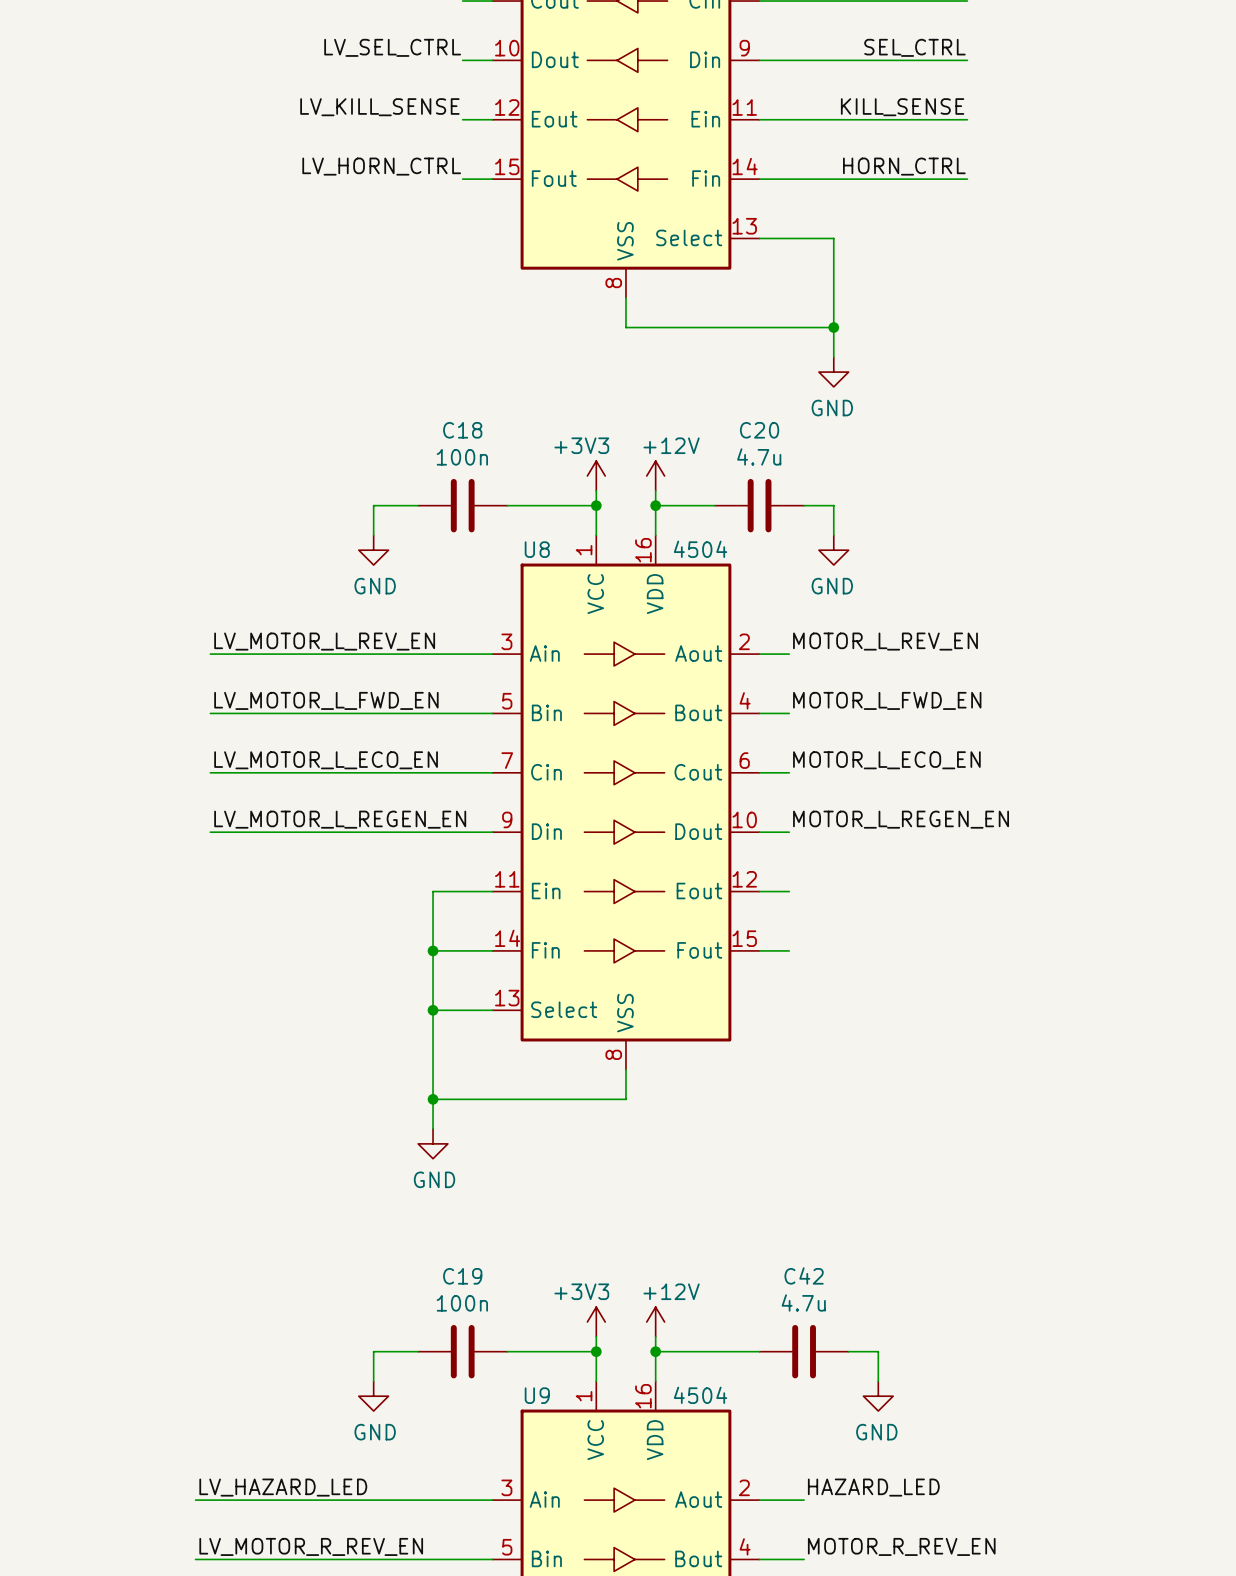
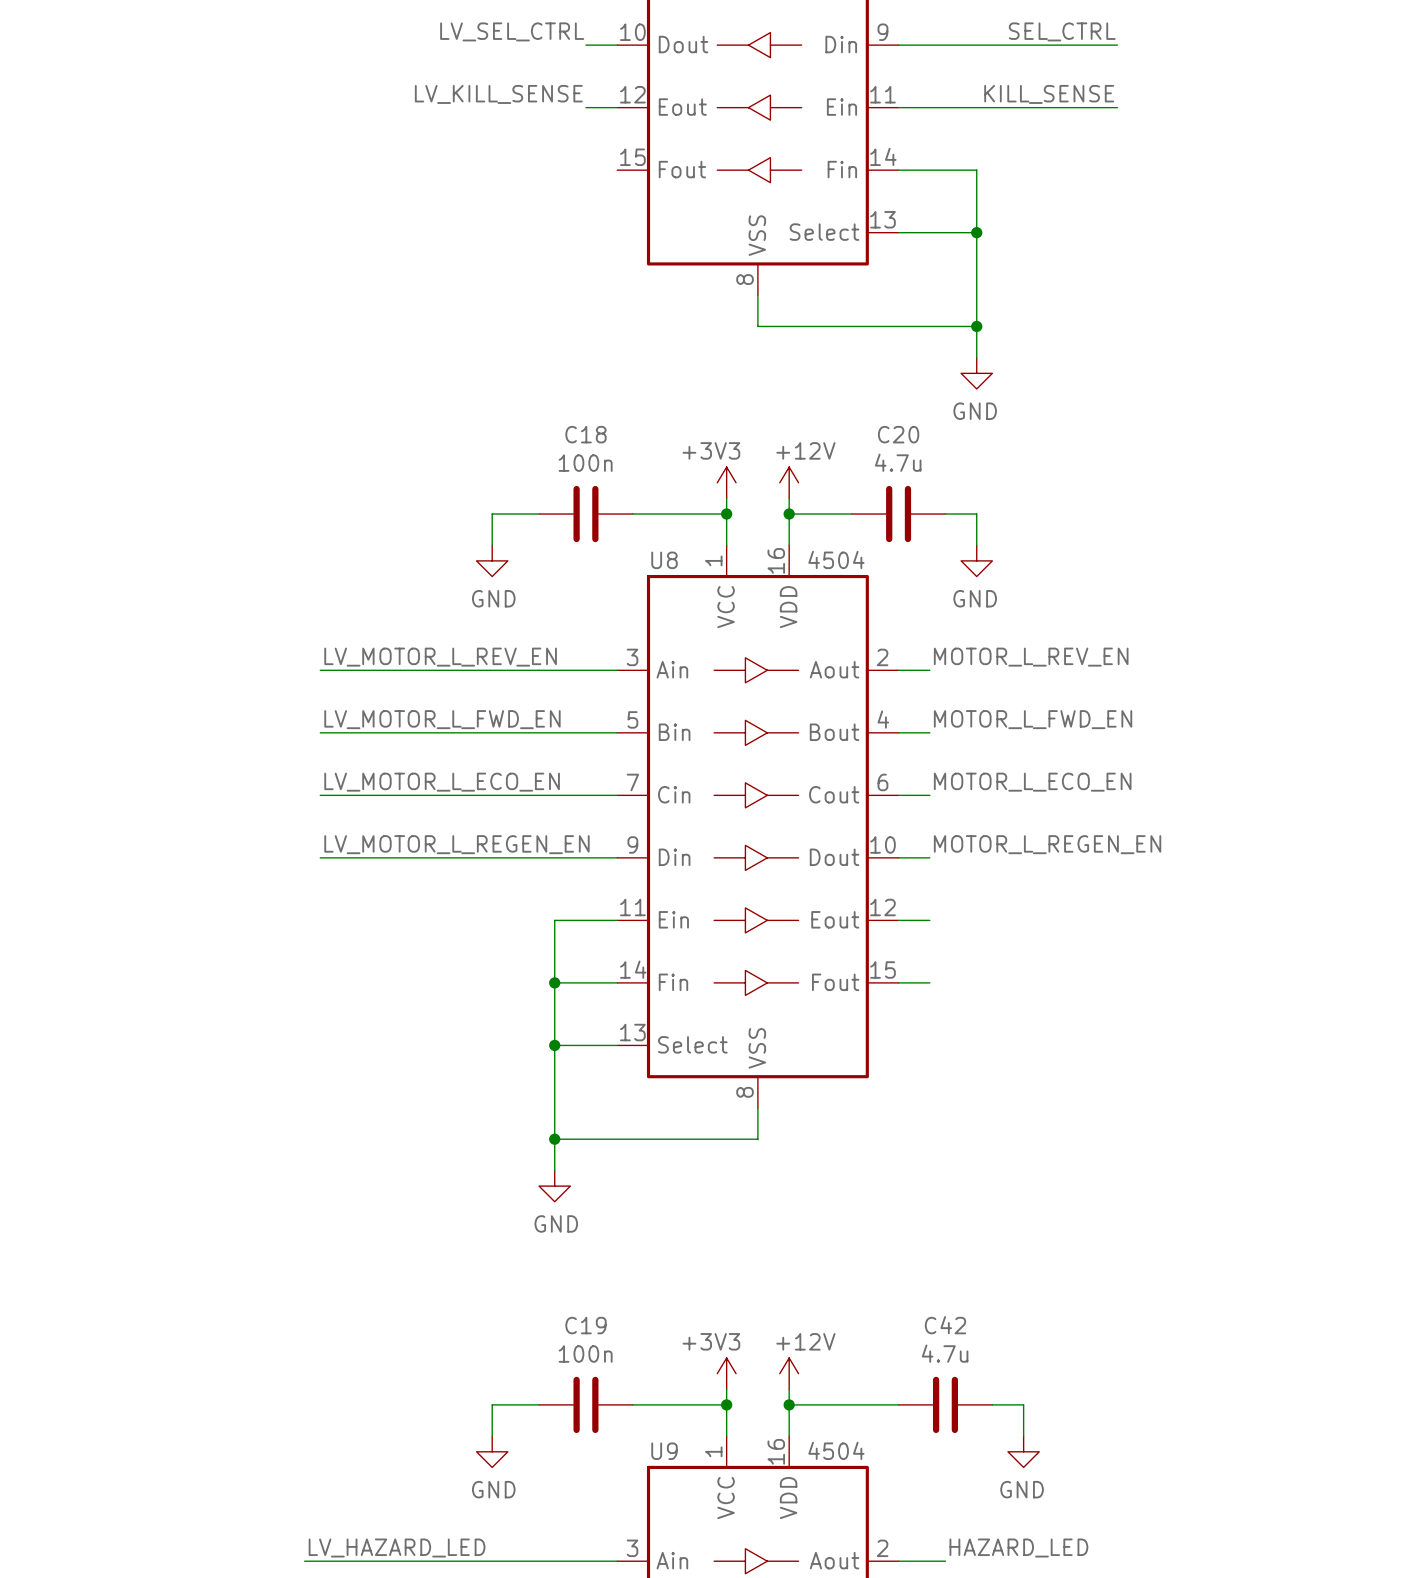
label: LV_HORN_CTRL (381, 166) -> none
label: HORN_CTRL (904, 166) -> none
wire: (462, 179) (492, 179) -> none
wire: (833, 179) (967, 179) -> (976, 170) (976, 232)
junction: none -> (976, 232)

